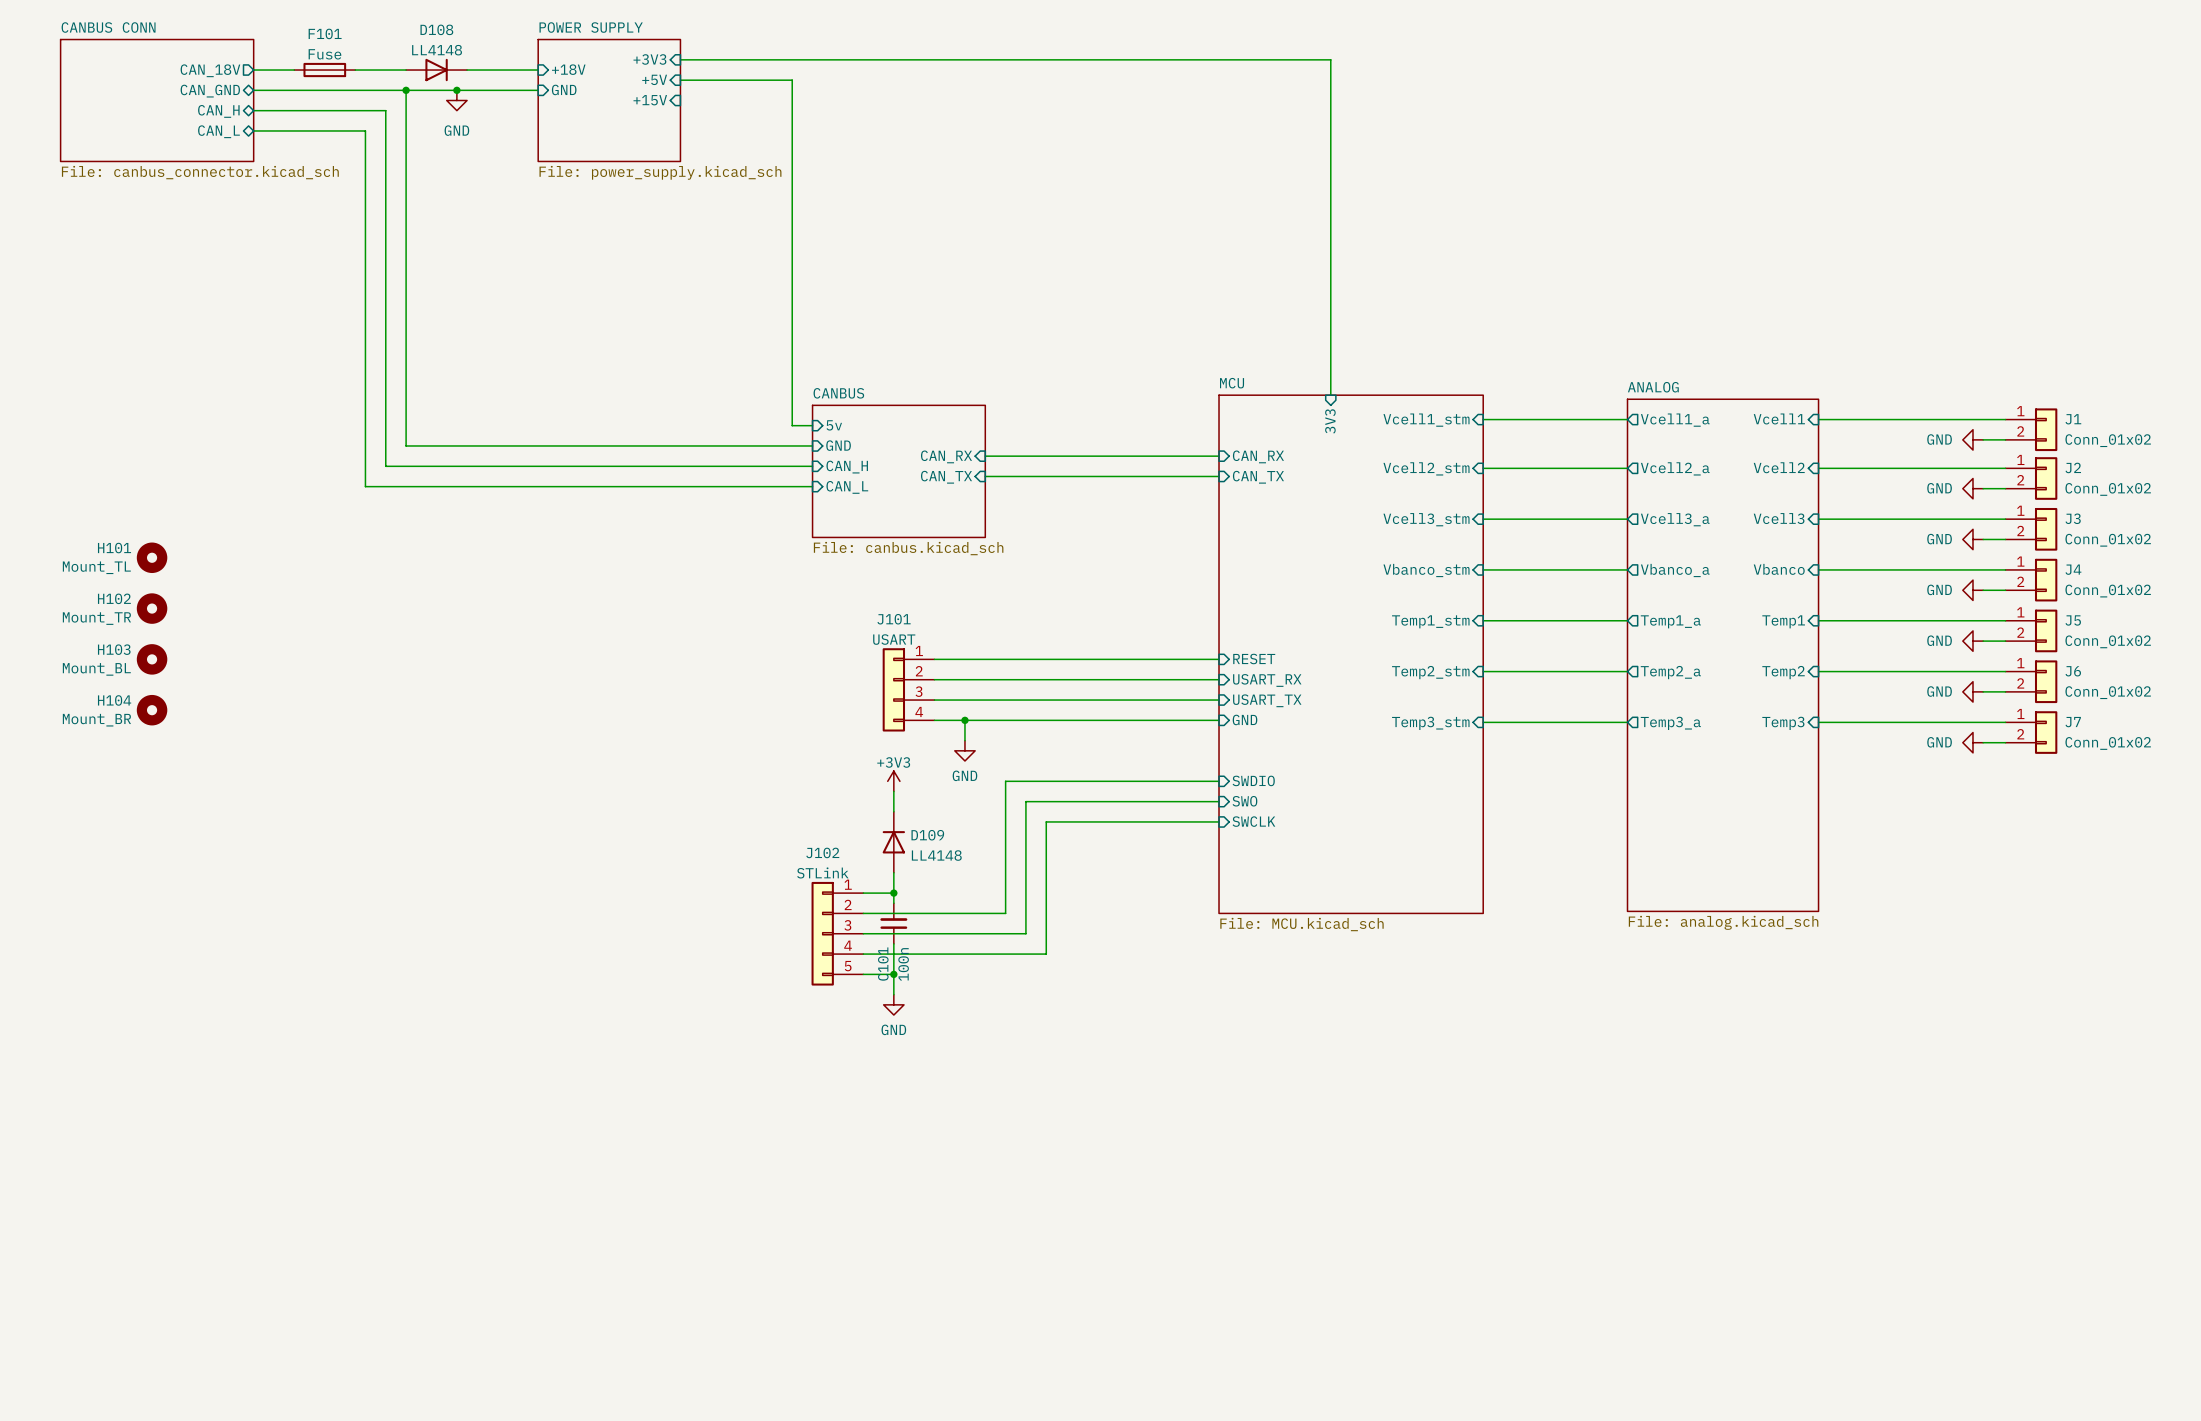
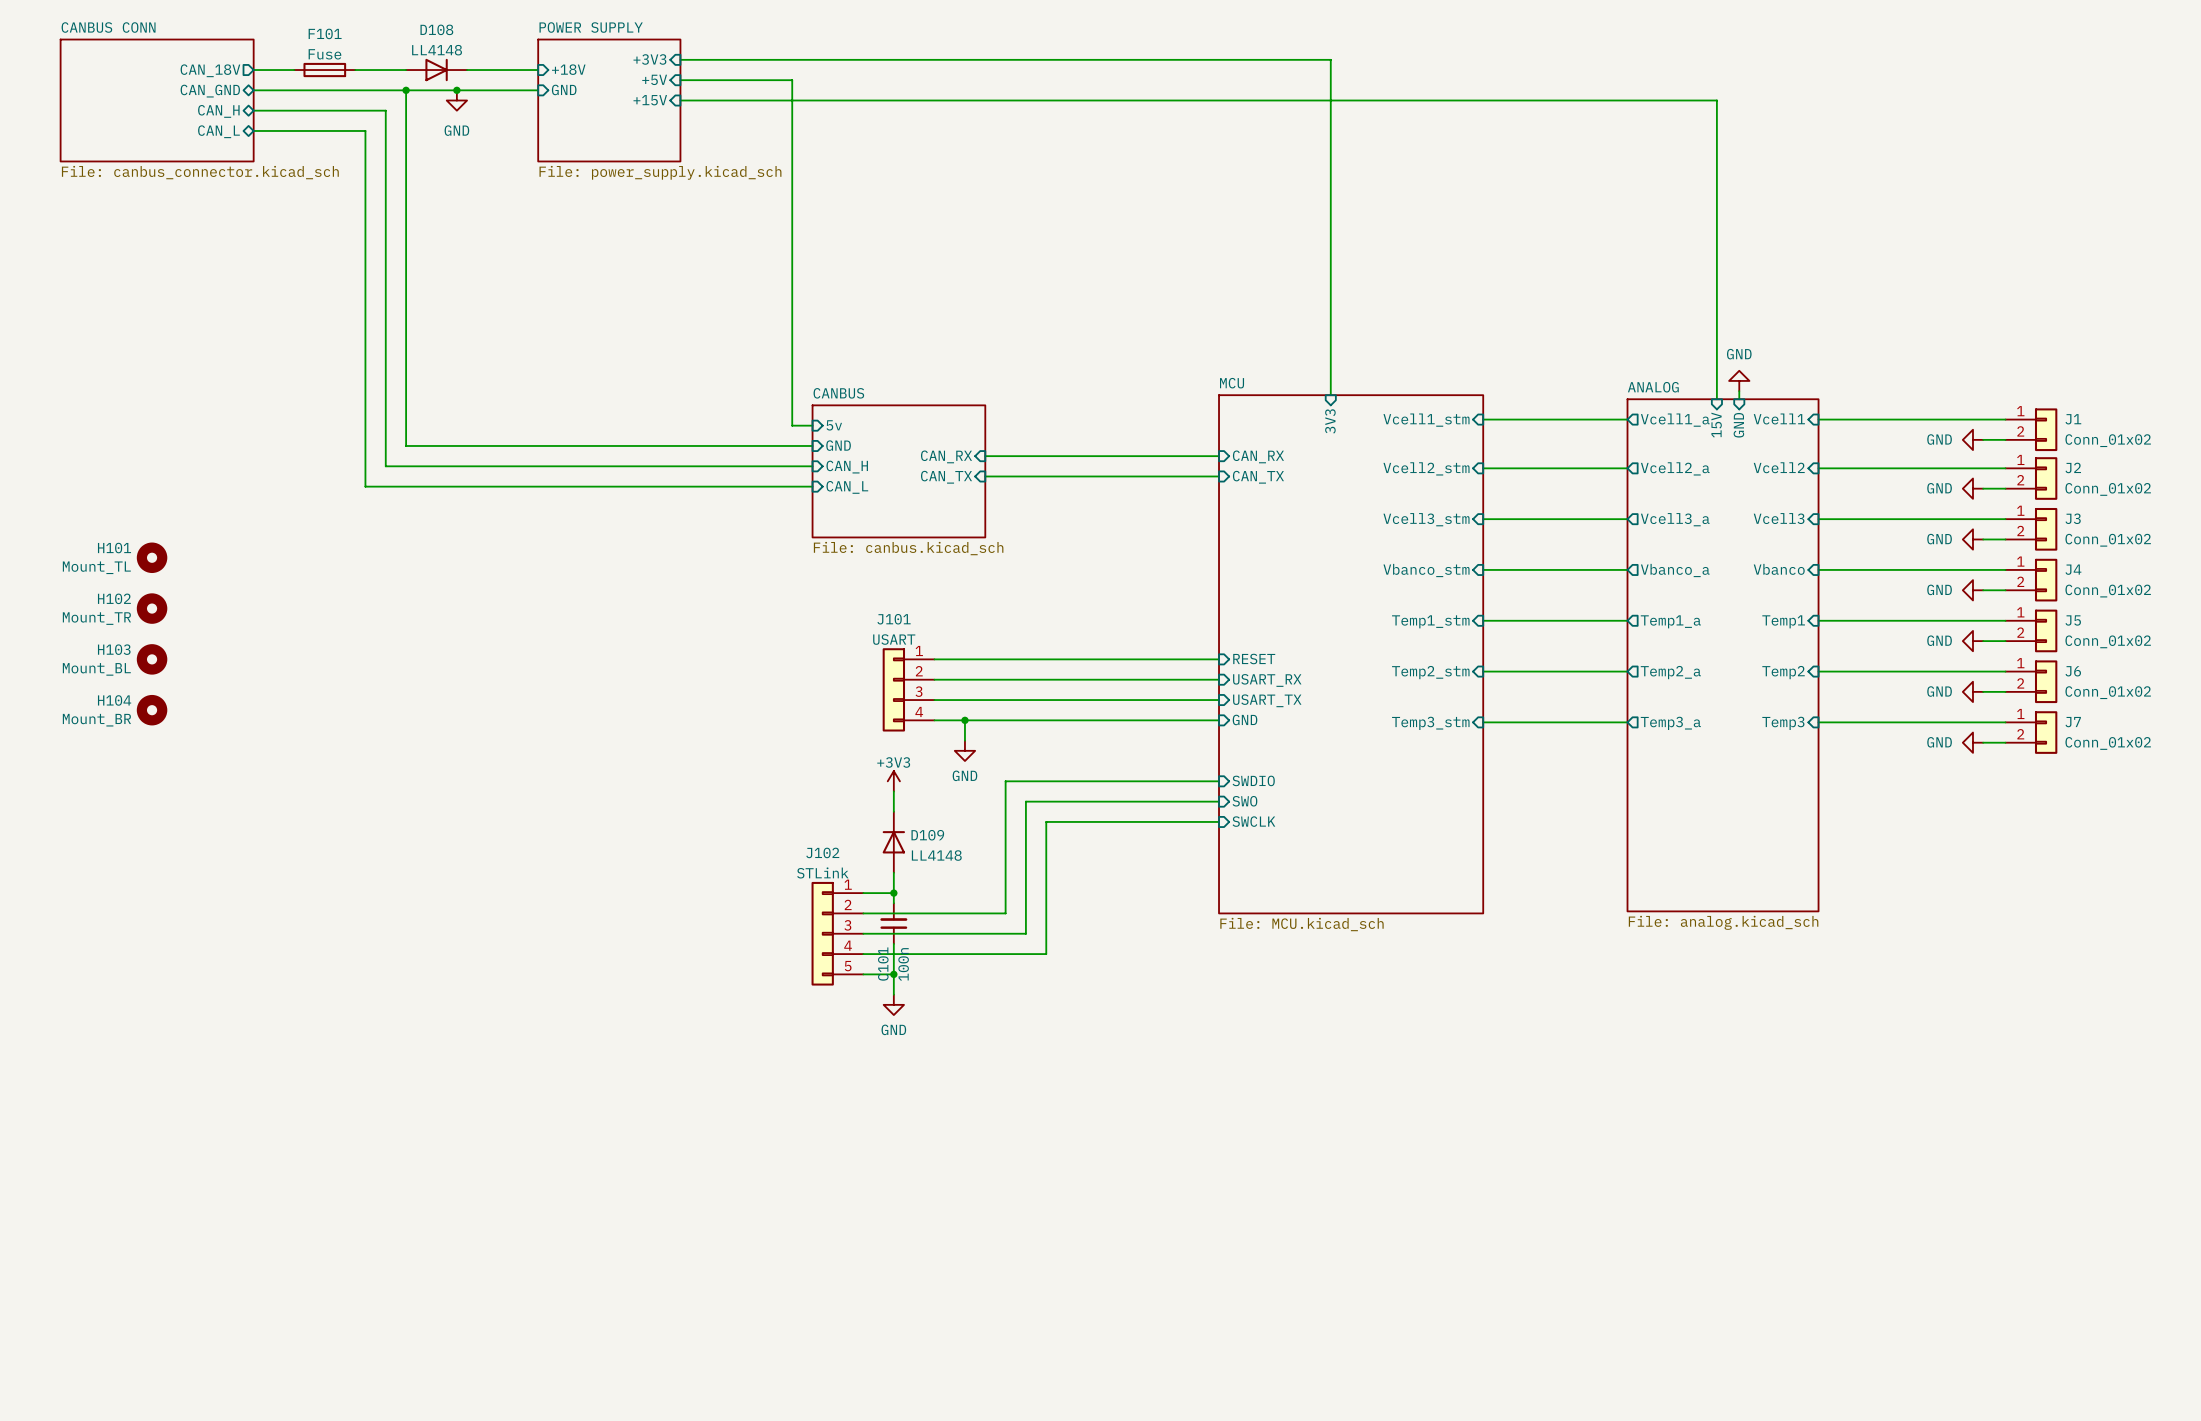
wire: none -> (680, 100) (1716, 100) (1716, 399)
power symbol: none -> GND (1739, 380)
wire: none -> (1739, 391) (1739, 399)
sheet pin: none -> 15V (1716, 425)
sheet pin: none -> GND (1738, 425)

